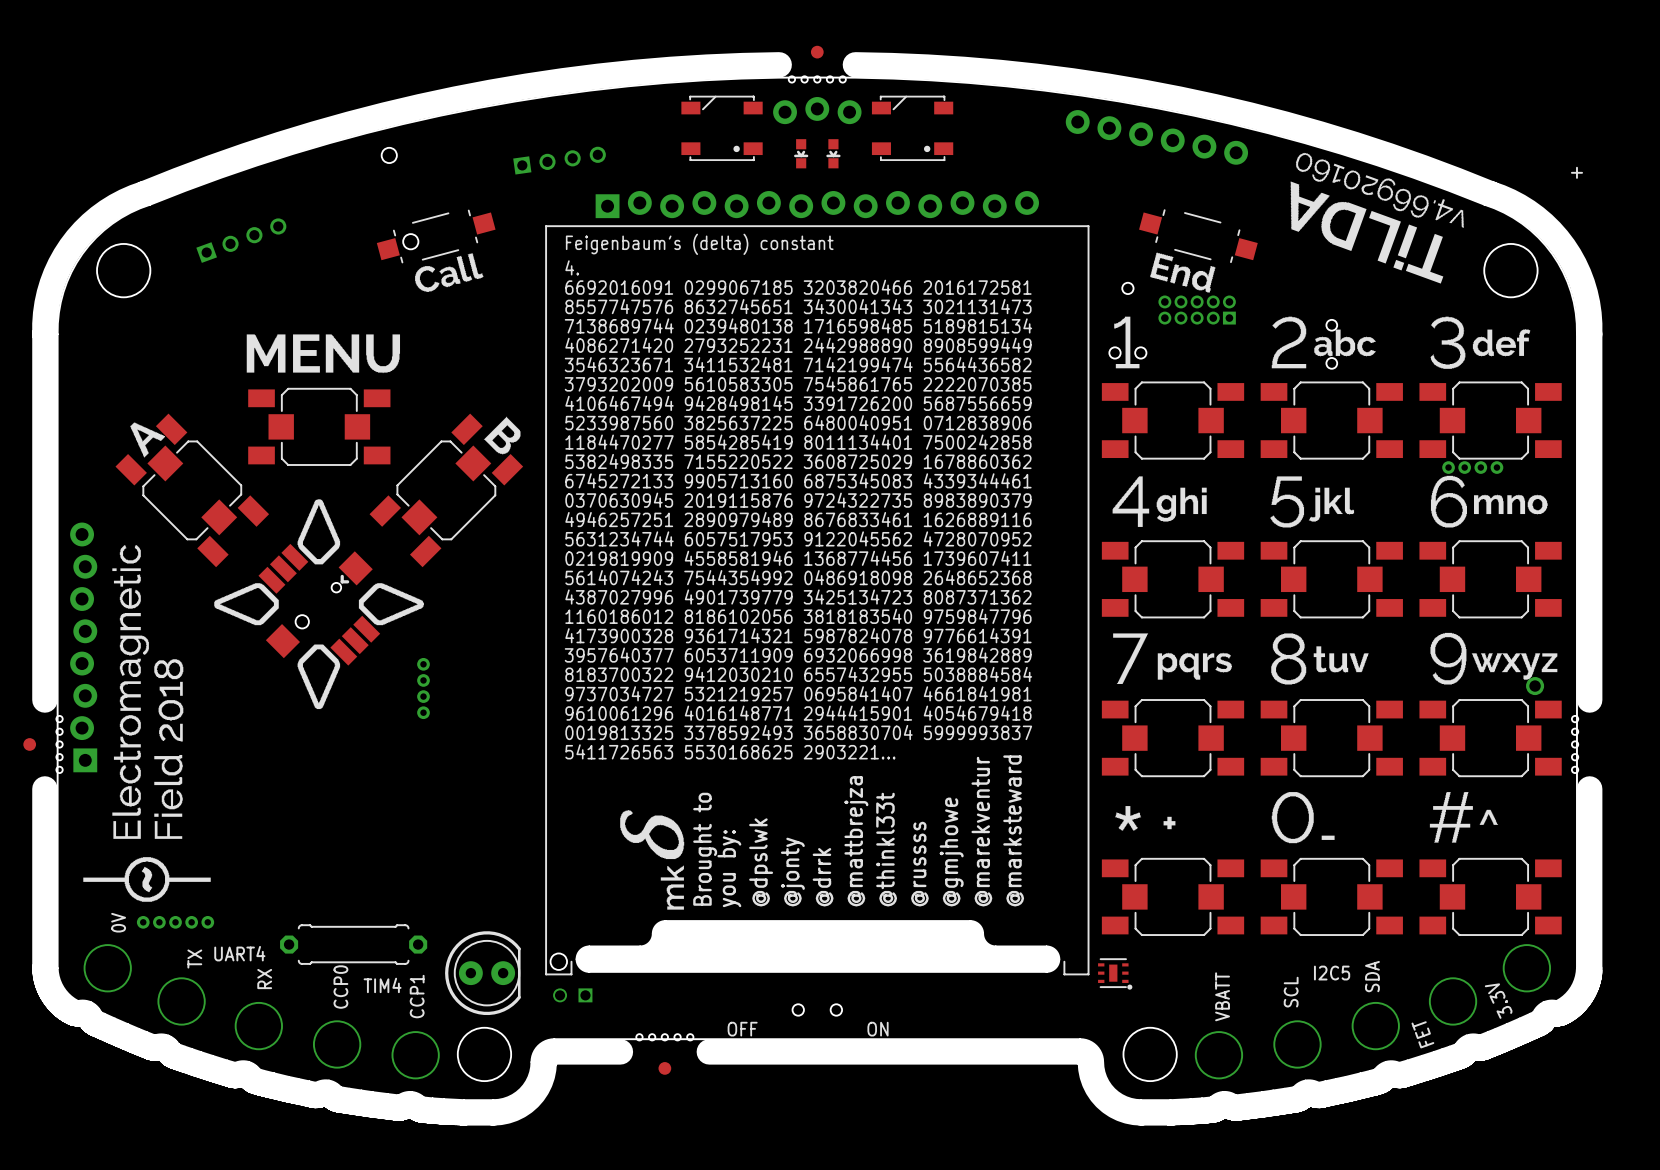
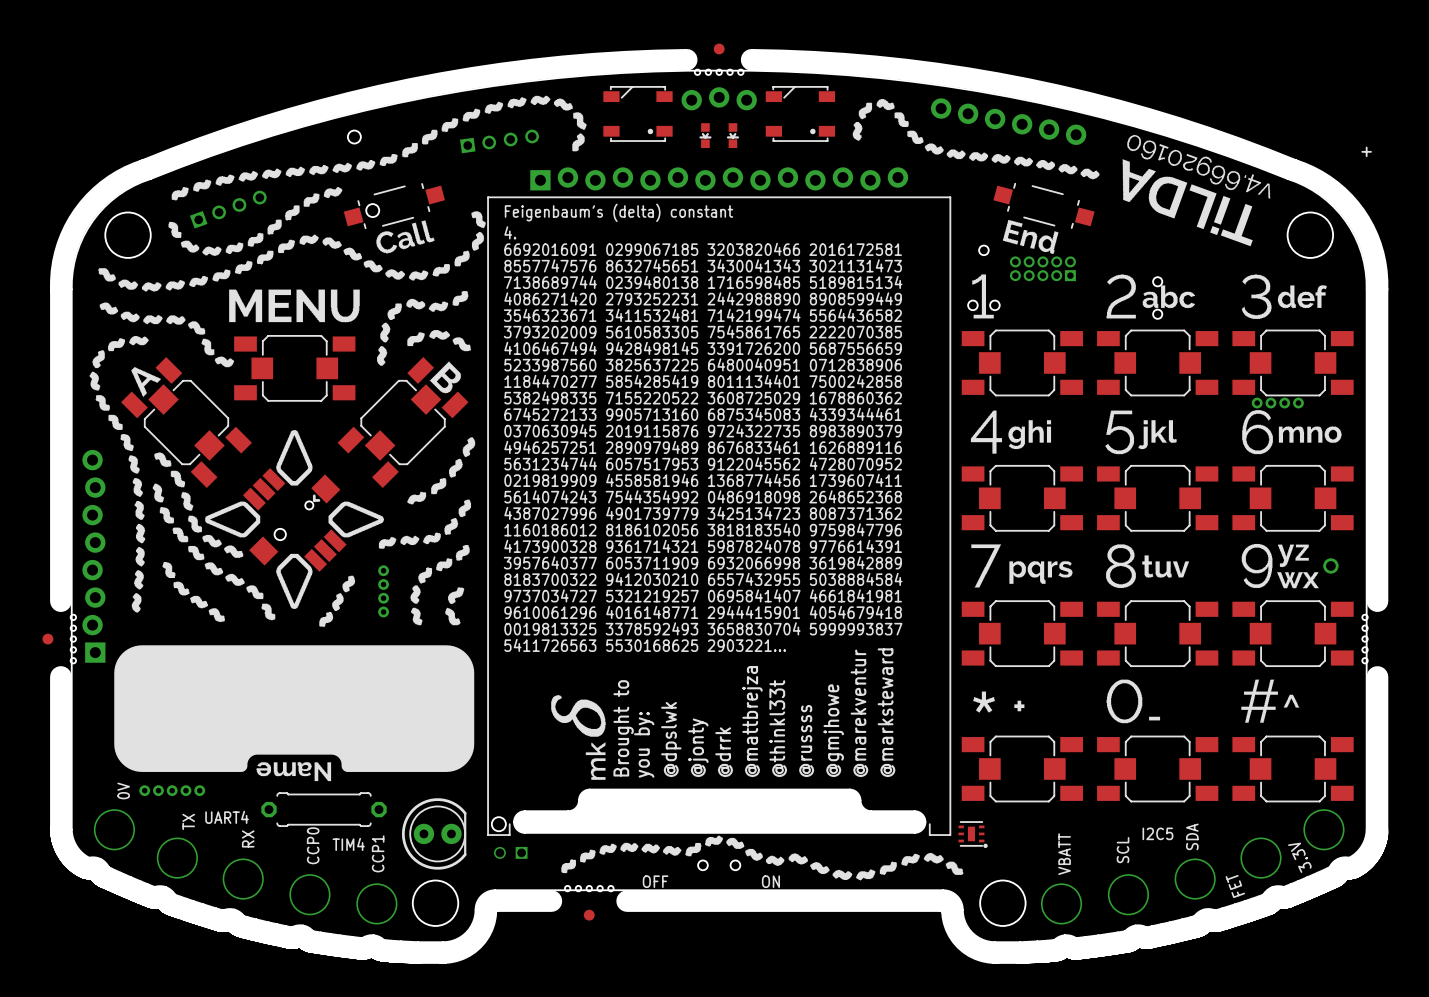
drawing: none -> [89, 95, 1342, 881]
drawing: [83, 152, 1558, 910] -> none
part position: (1535, 686) -> (1330, 565)

